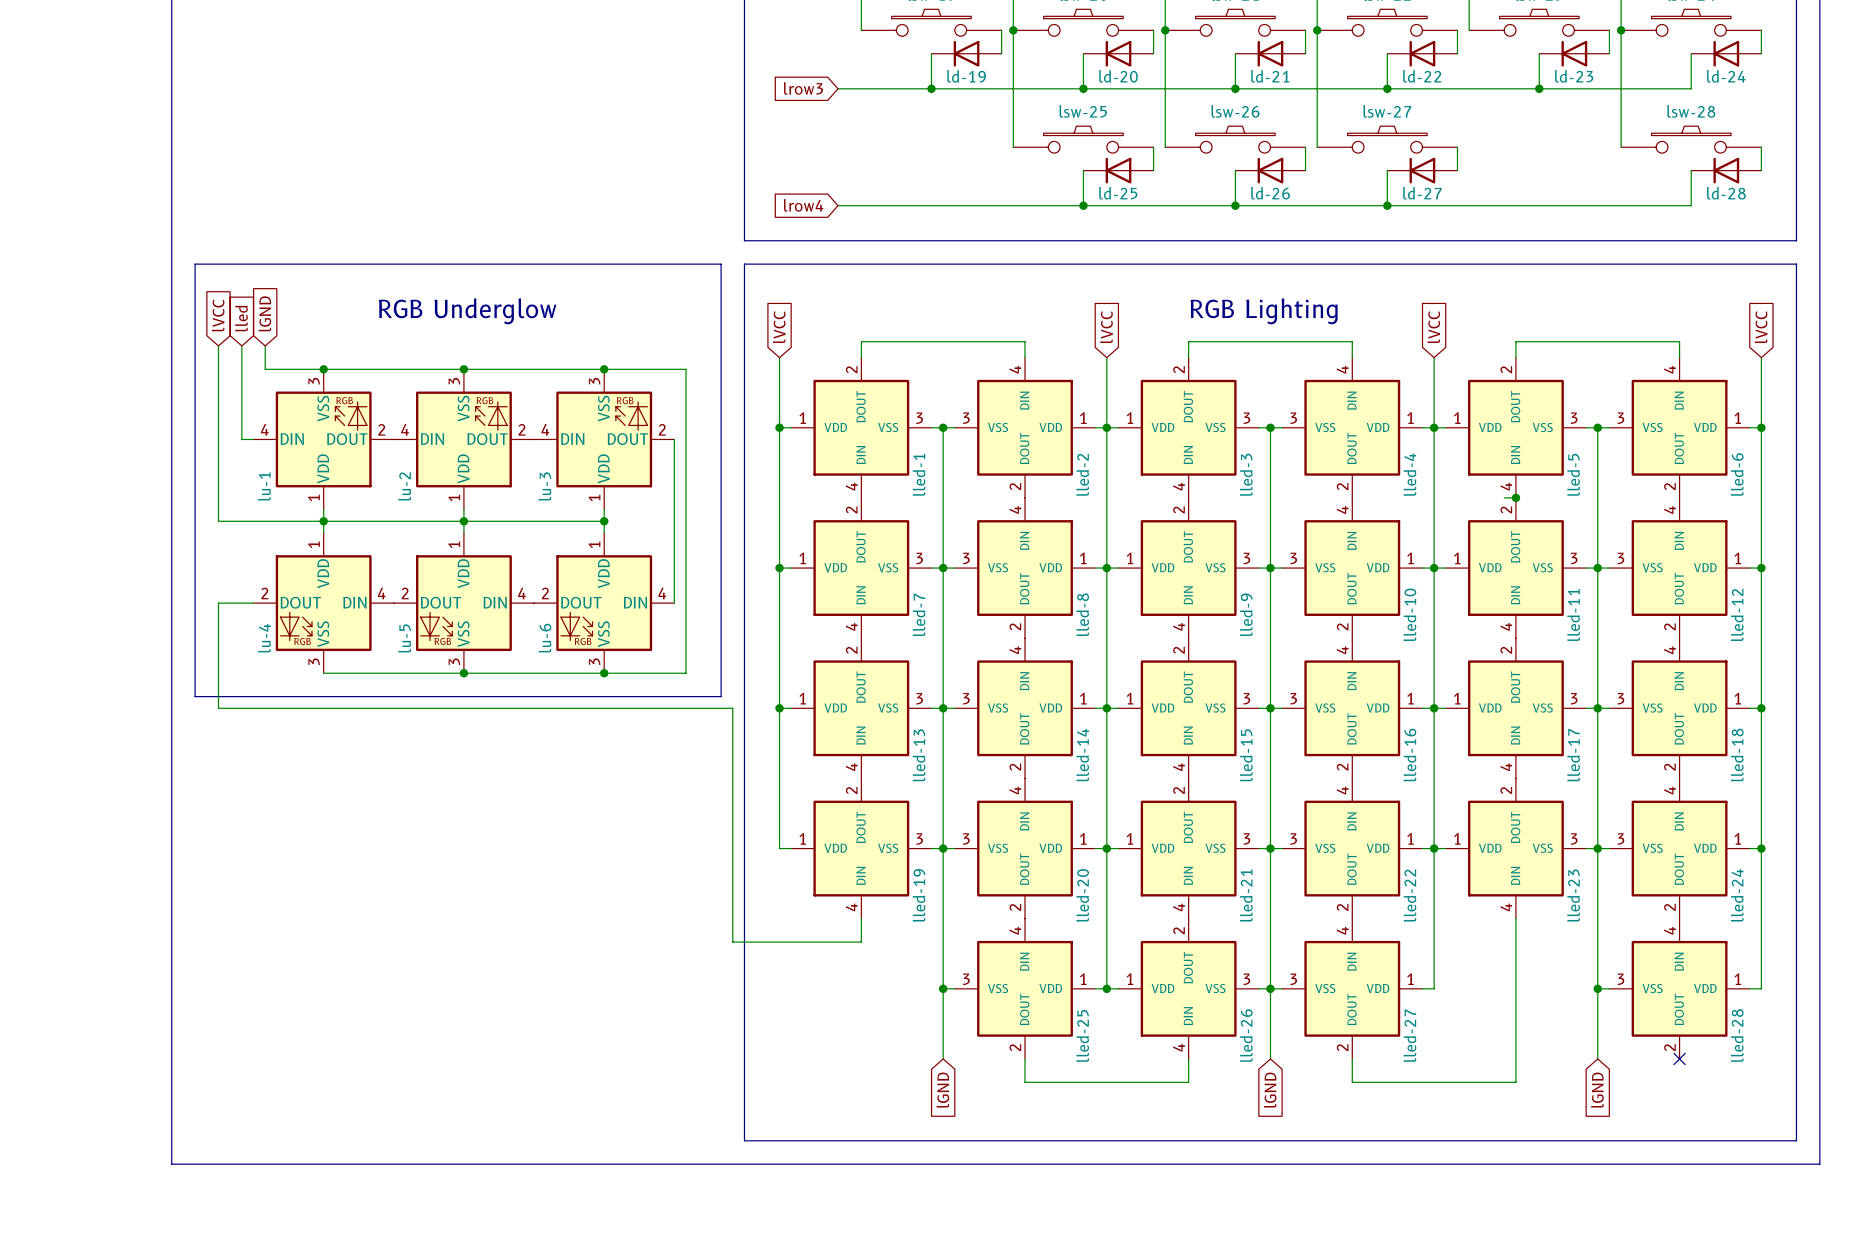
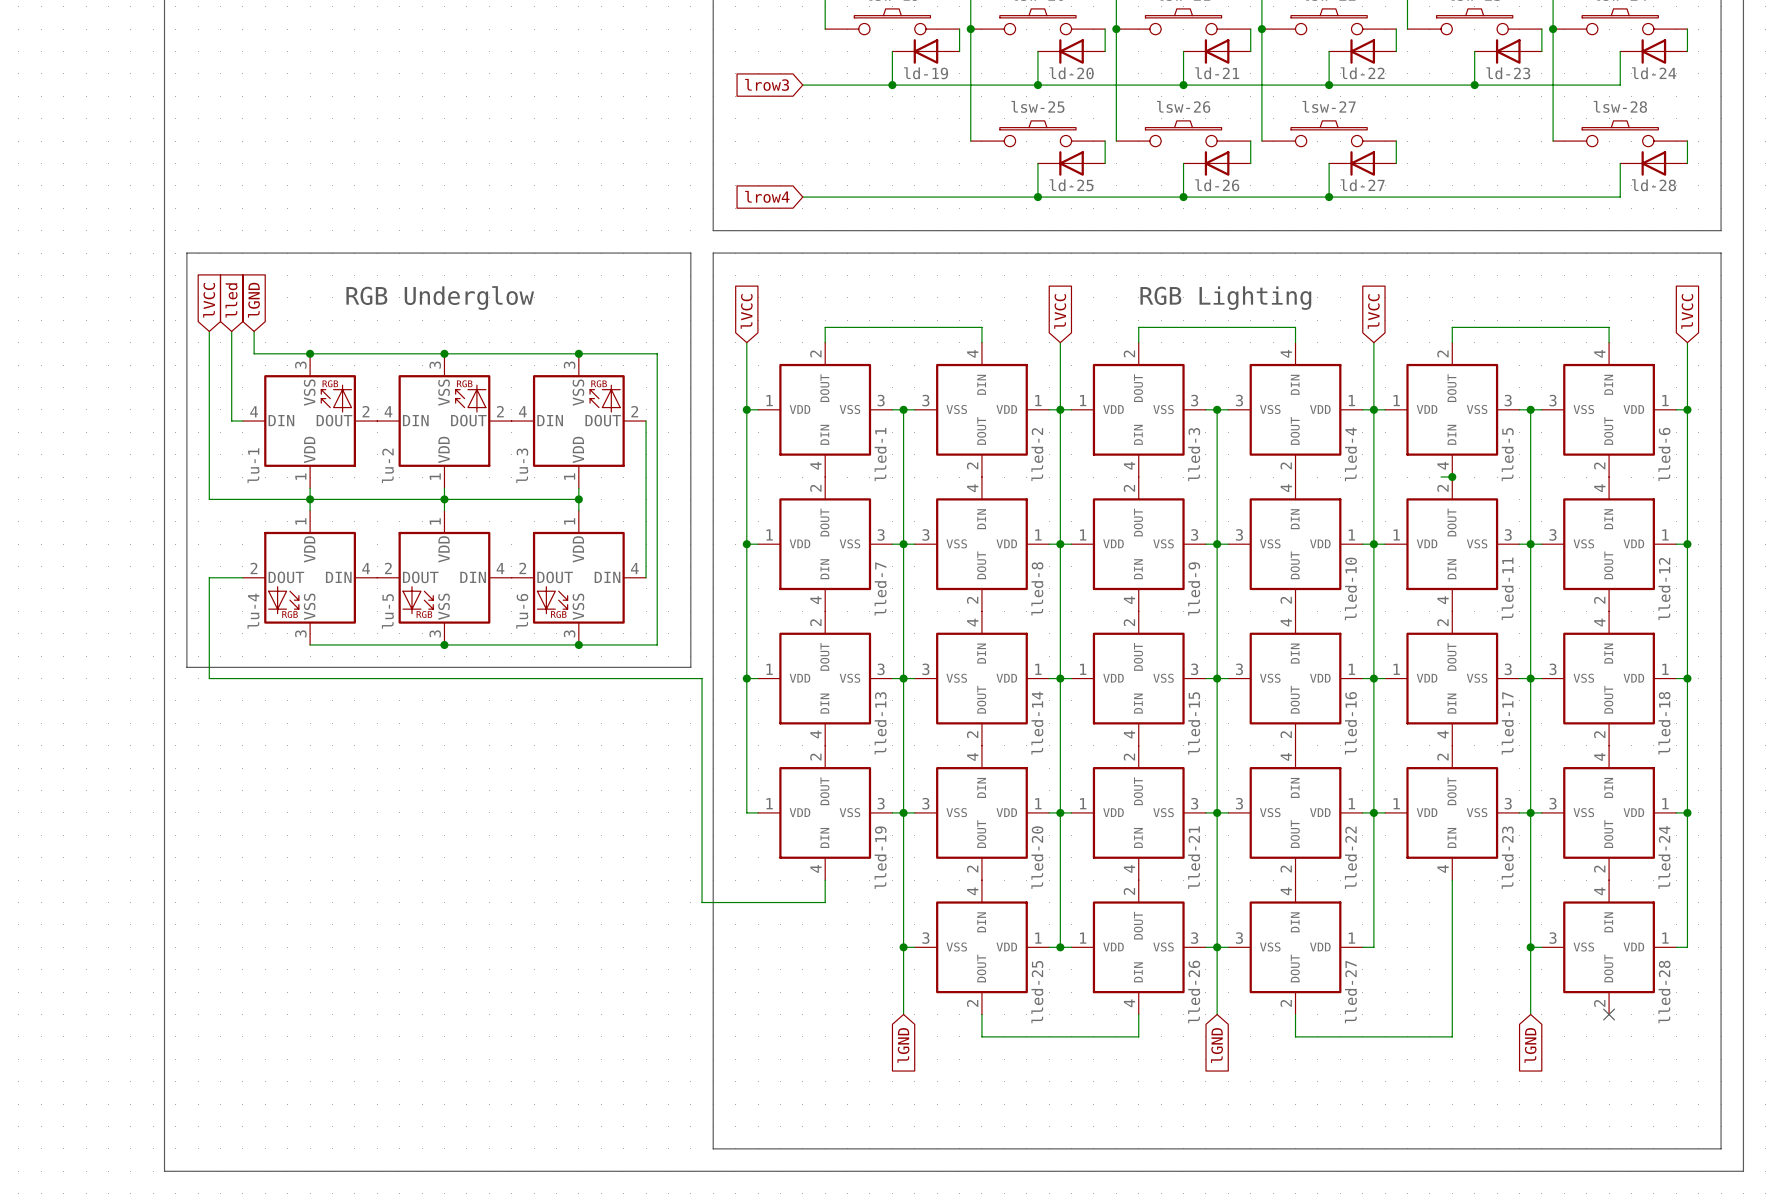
line: (744, 1140) (1796, 1140) -> (713, 1092) (713, 1148) (1721, 1148) (1721, 1092)
line: (171, 1164) (1819, 1164) -> (164, 1115) (164, 1171) (1743, 1171) (1743, 1115)

